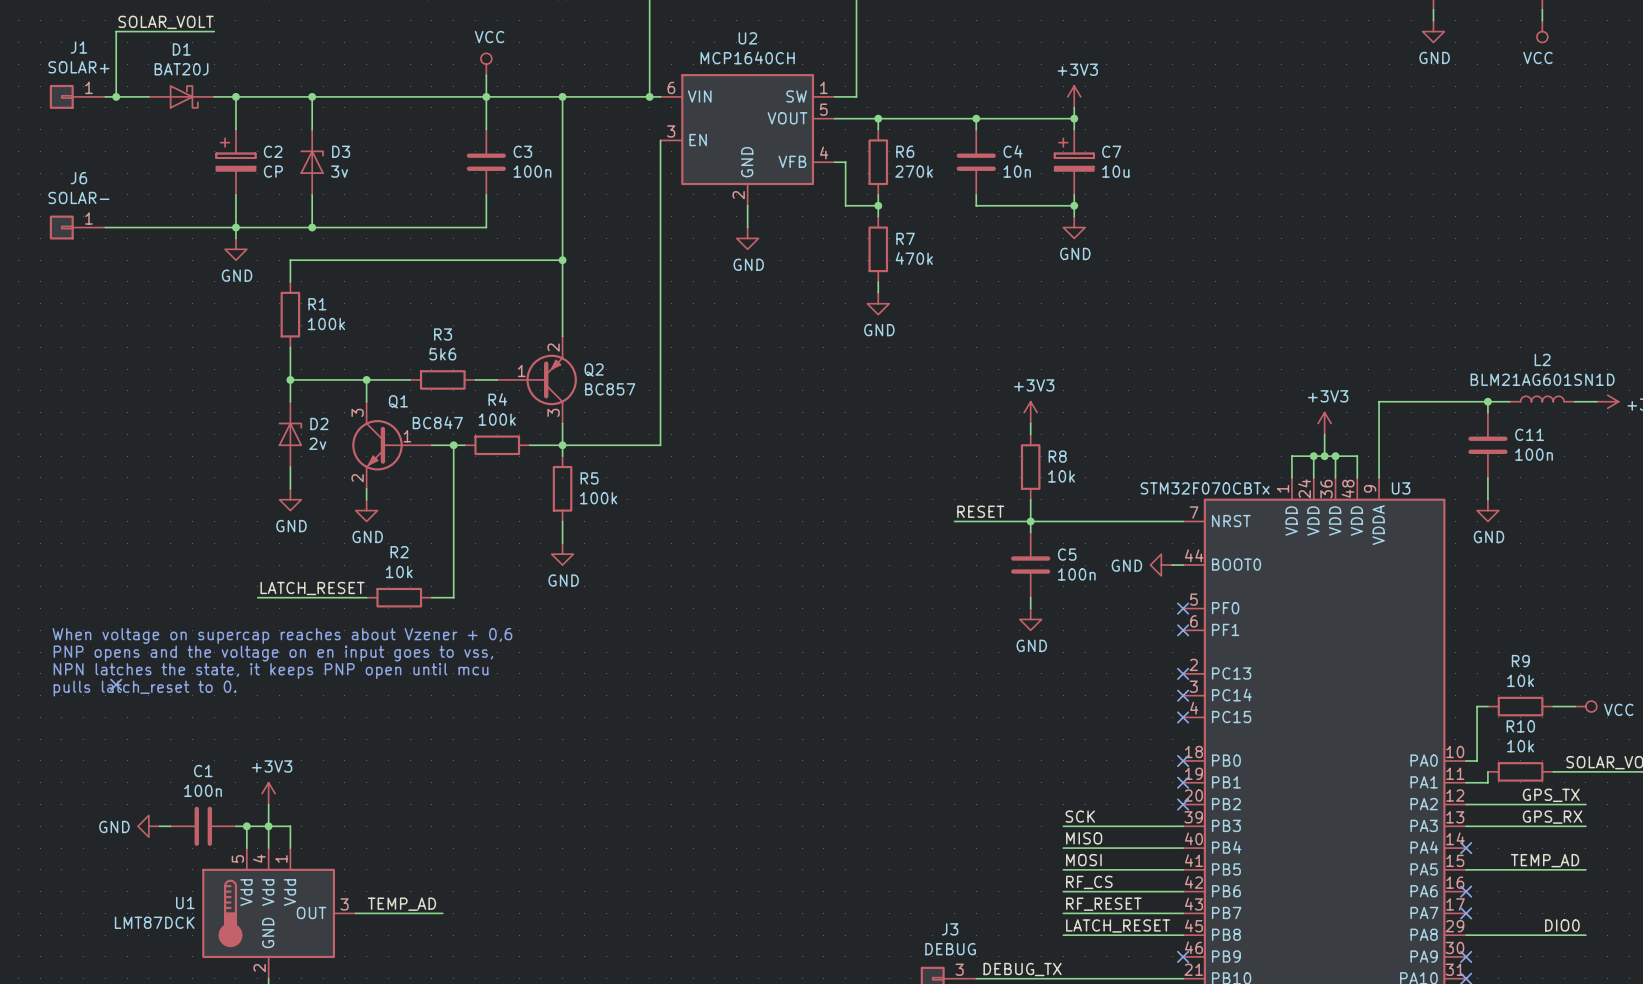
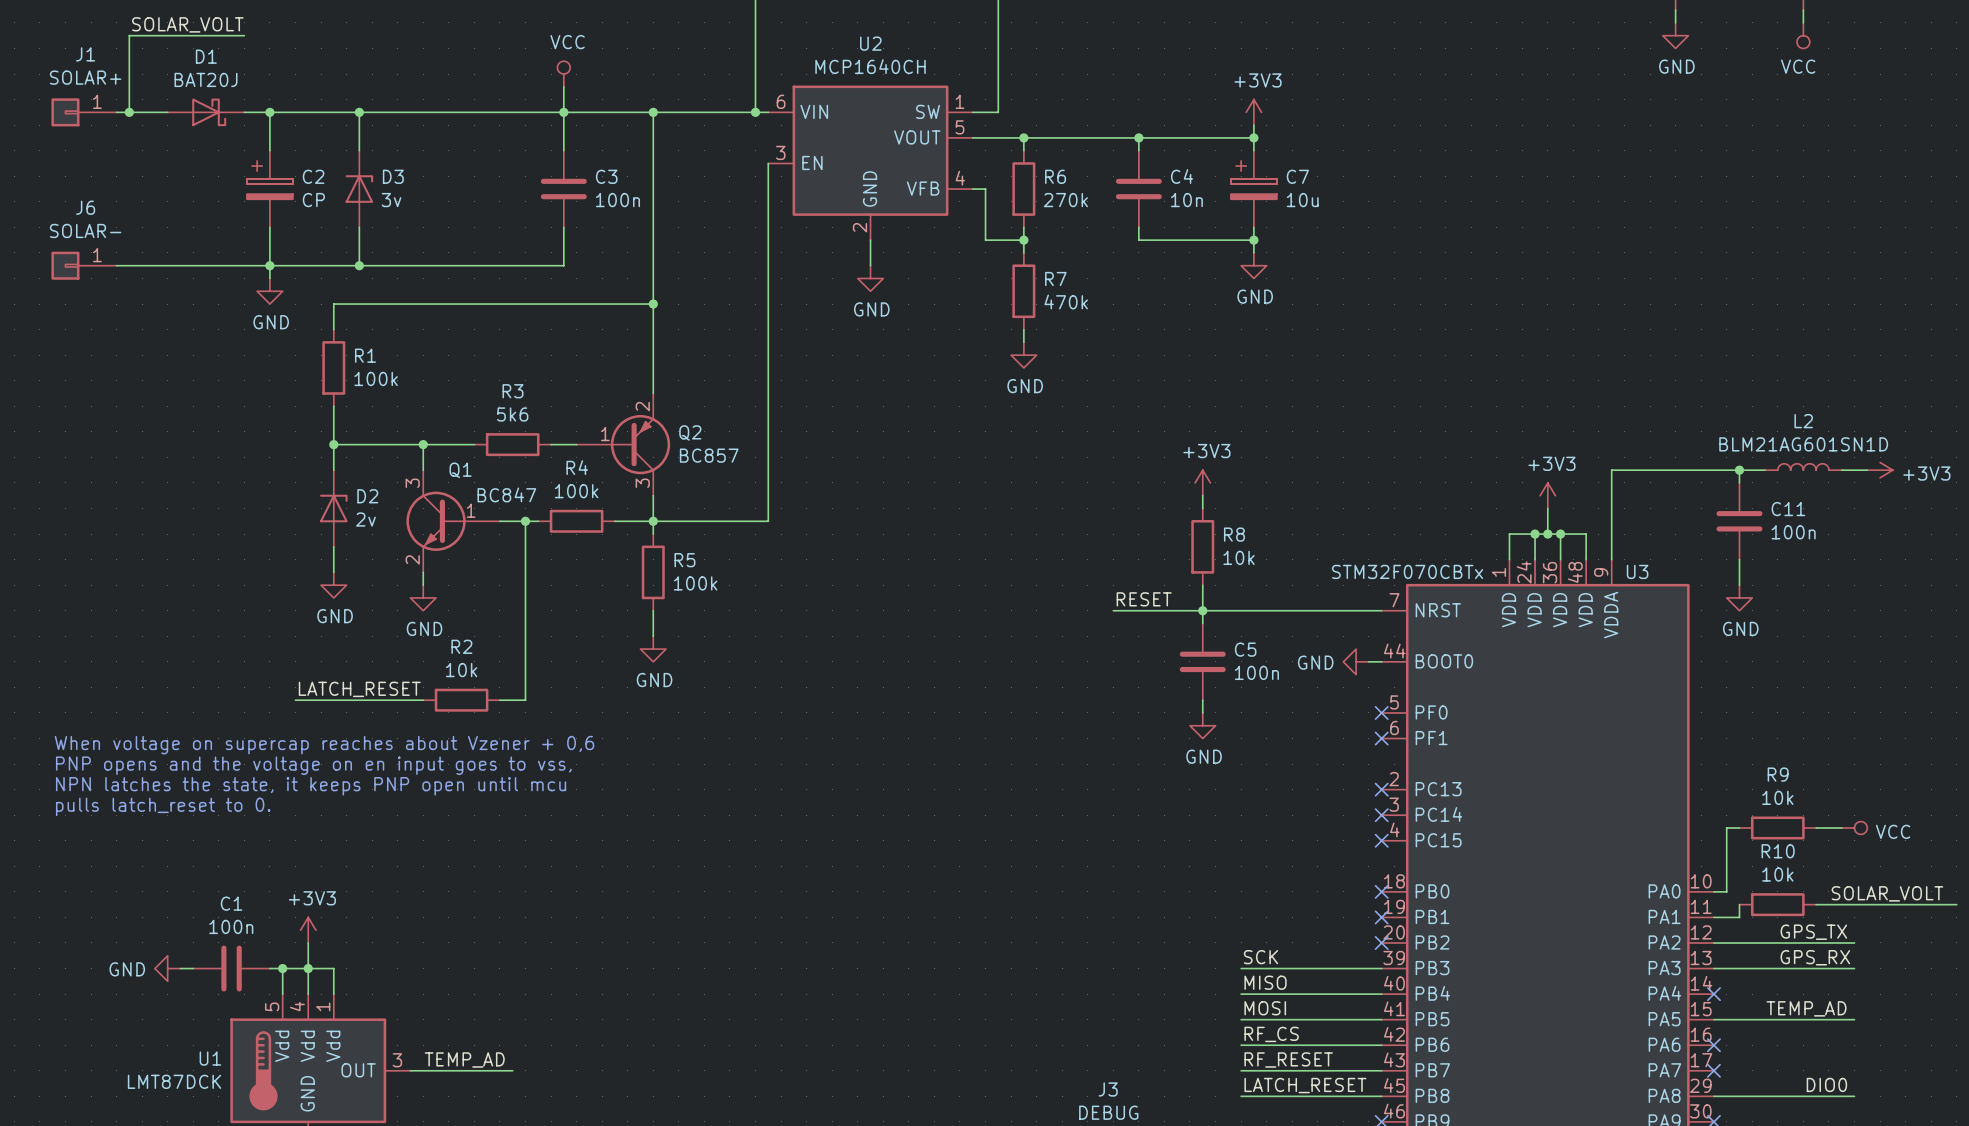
no-connect mark: (116, 684) -> none

